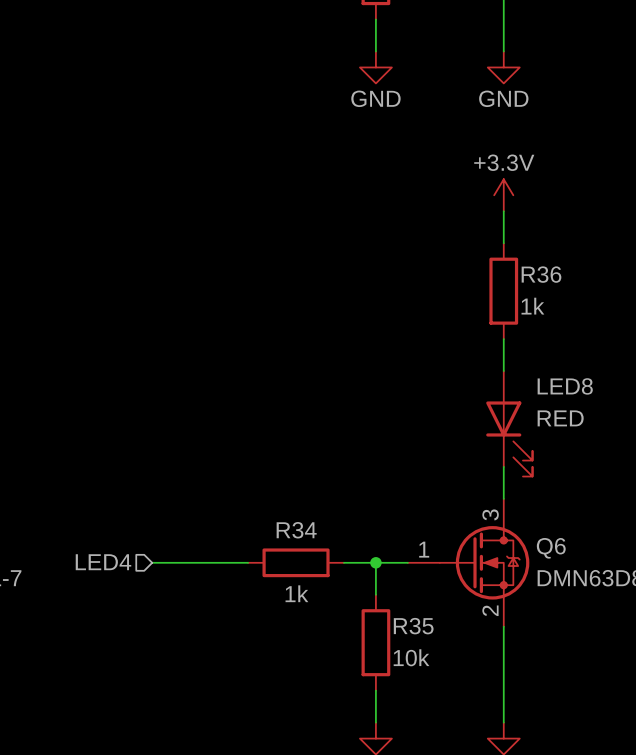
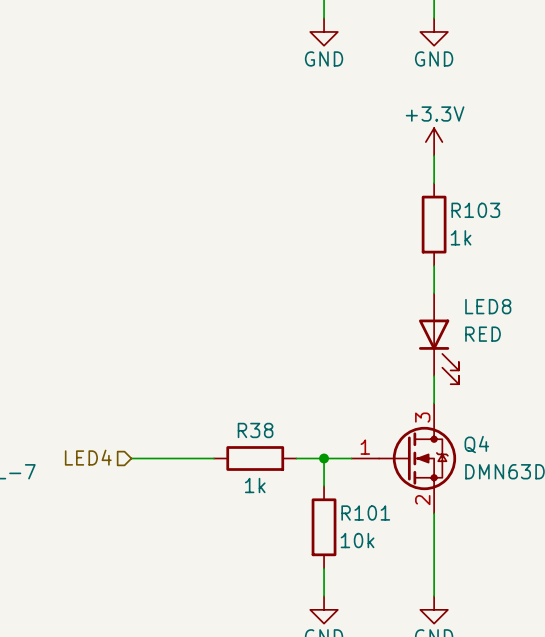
R36 name: R36 (541, 274) -> R103 (475, 210)
R34 name: R34 (296, 530) -> R38 (255, 430)
Q6 name: Q6 (551, 548) -> Q4 (476, 444)
R35 name: R35 (413, 626) -> R101 (365, 513)

